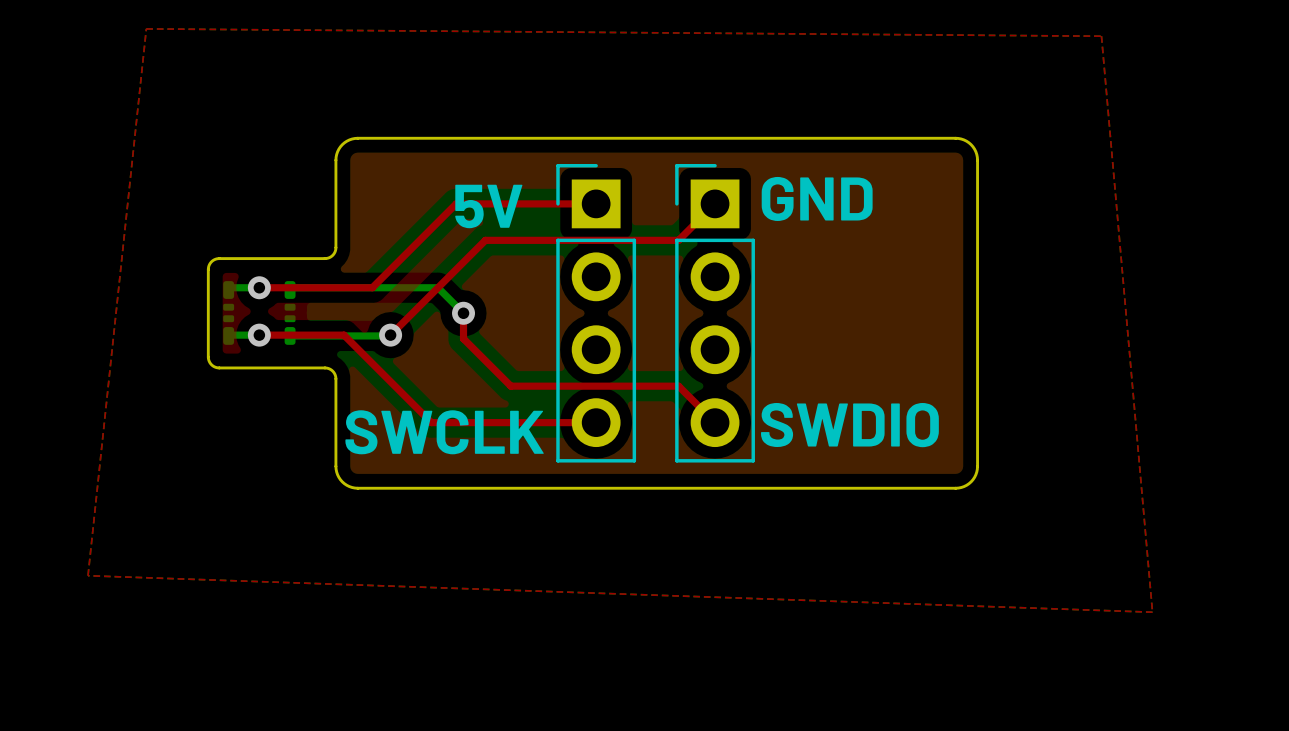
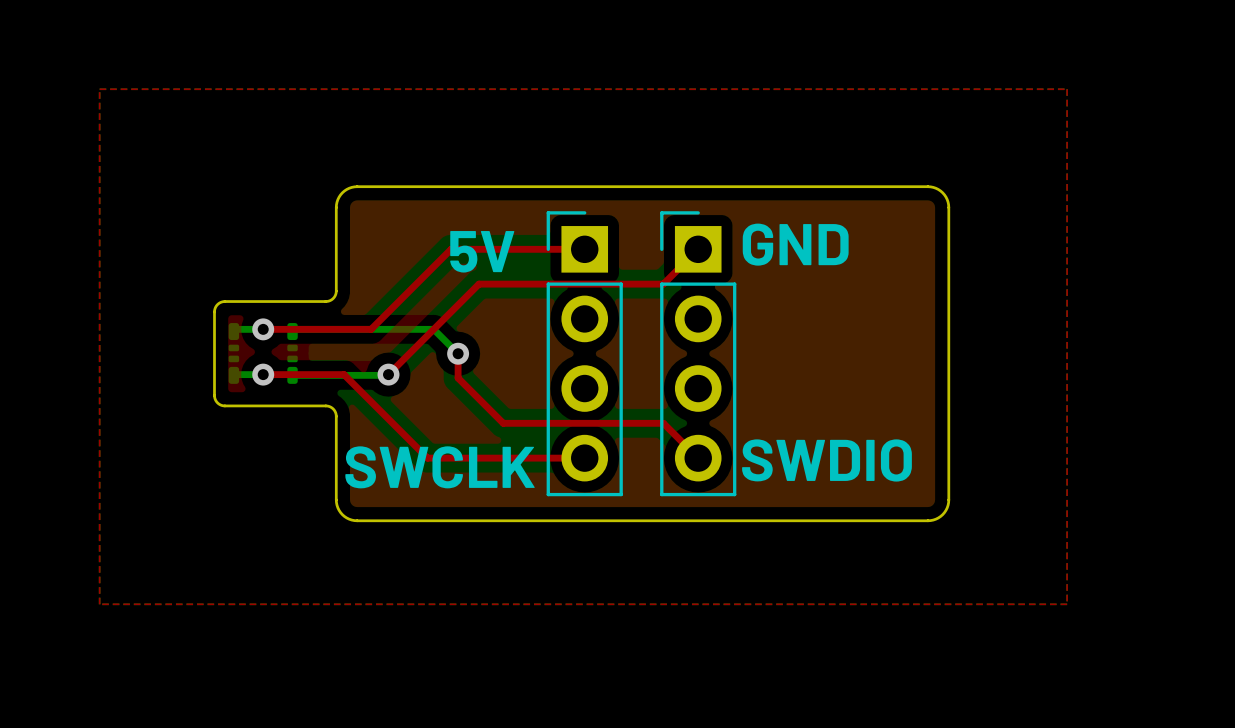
top zone outline: (146, 28) (1101, 36) (1152, 612) (88, 575) (146, 28) -> (99, 89) (99, 604) (1067, 604) (1067, 89) (99, 89)

